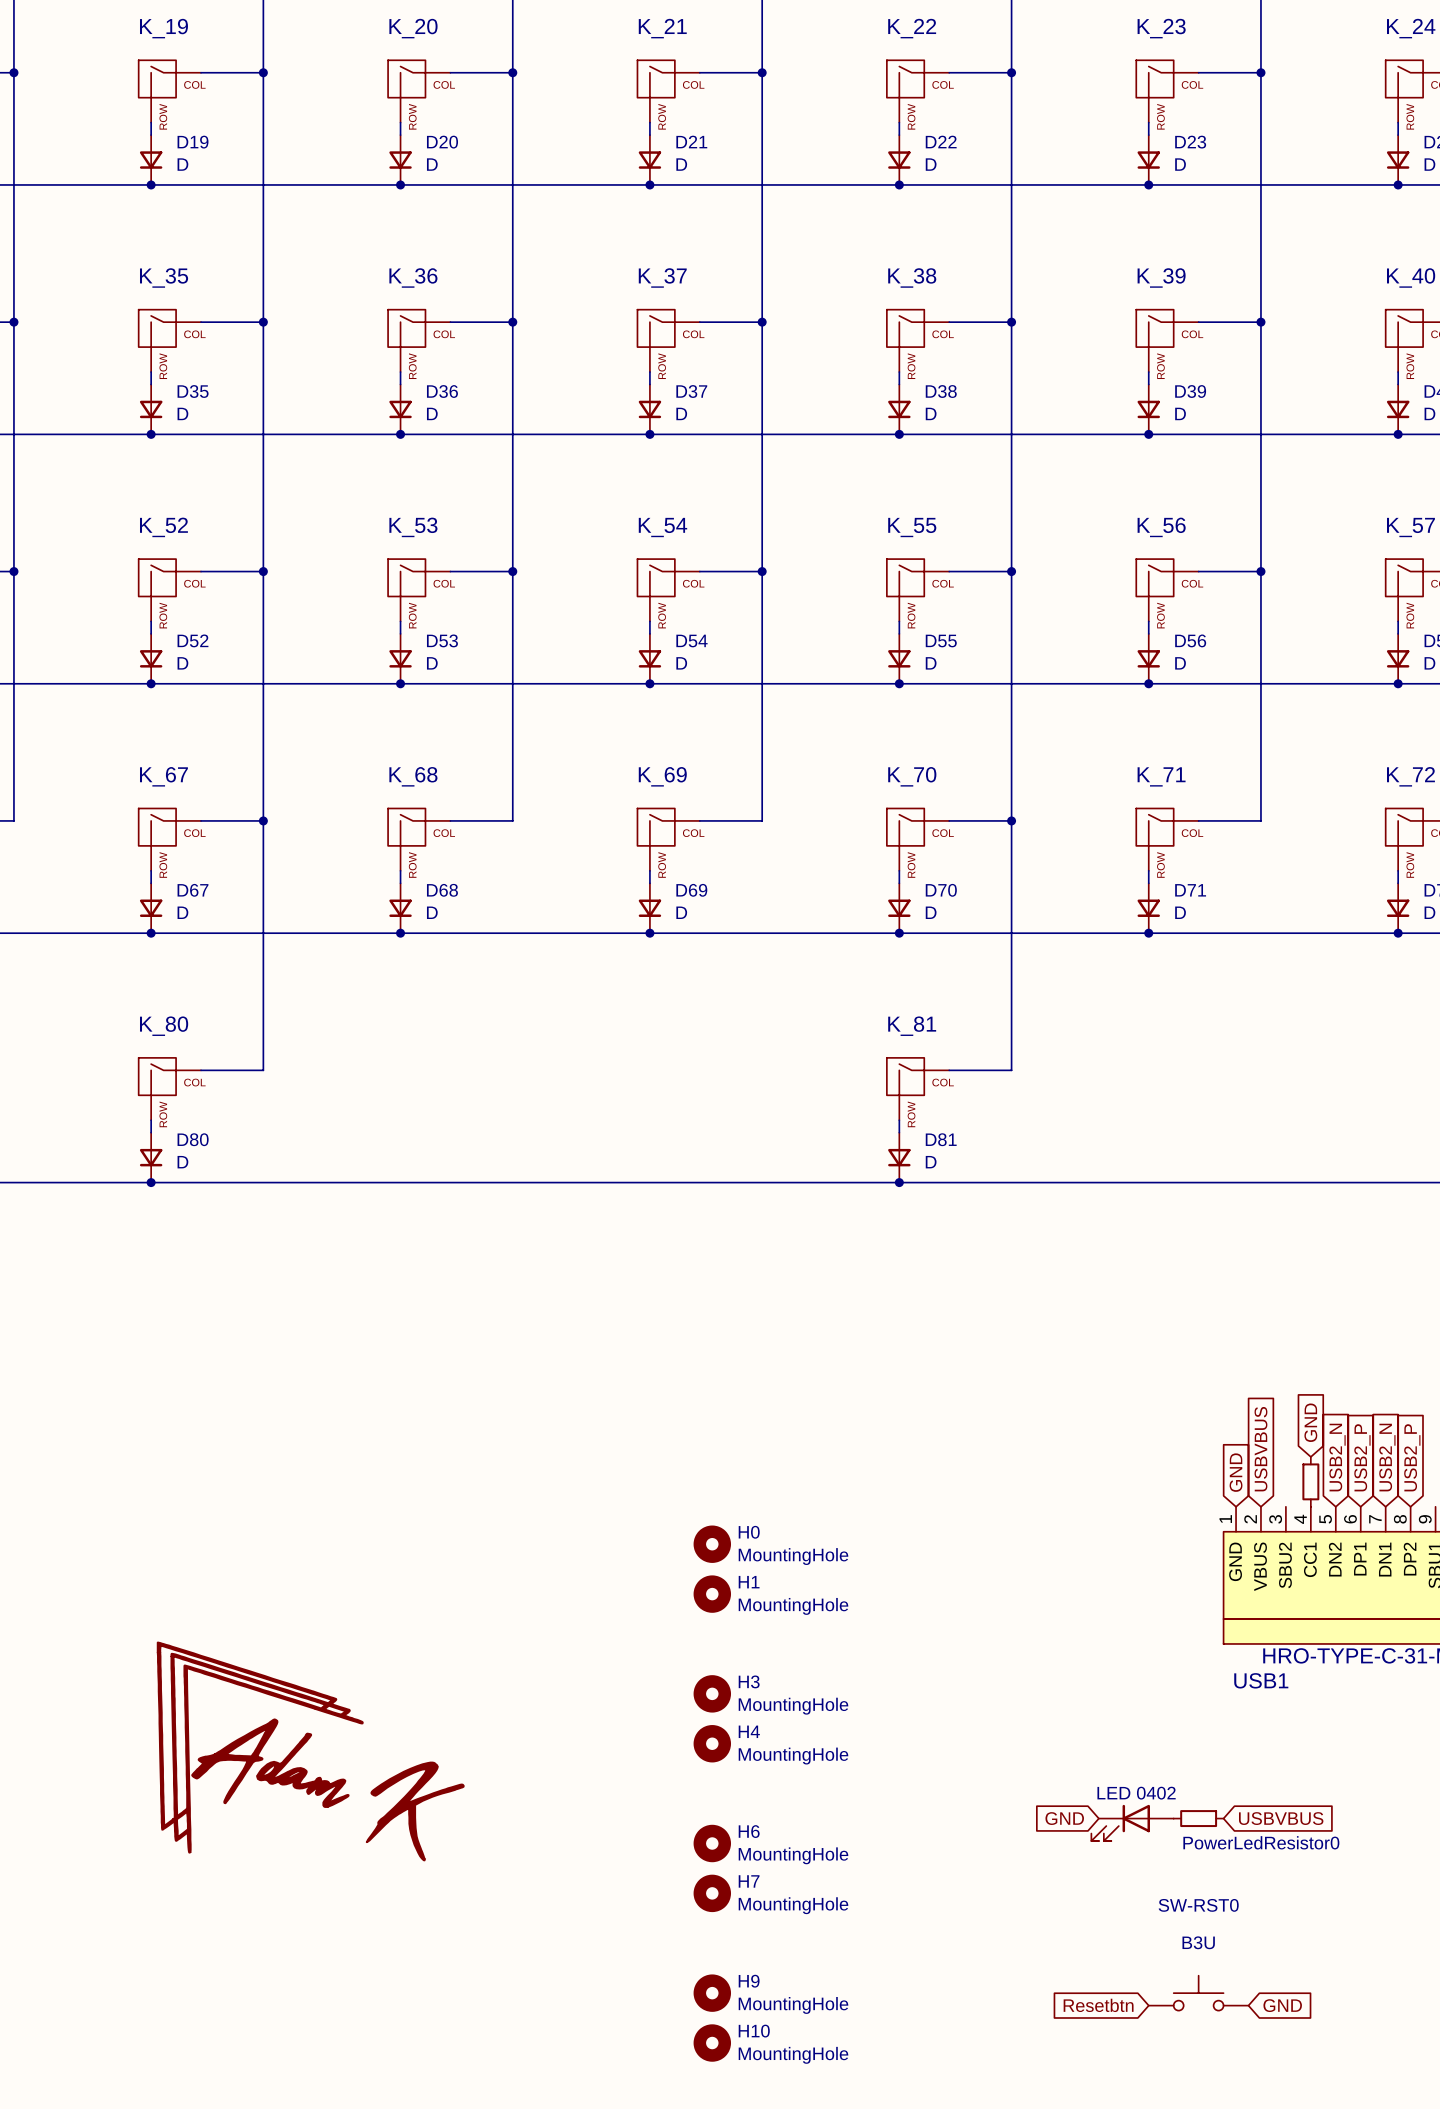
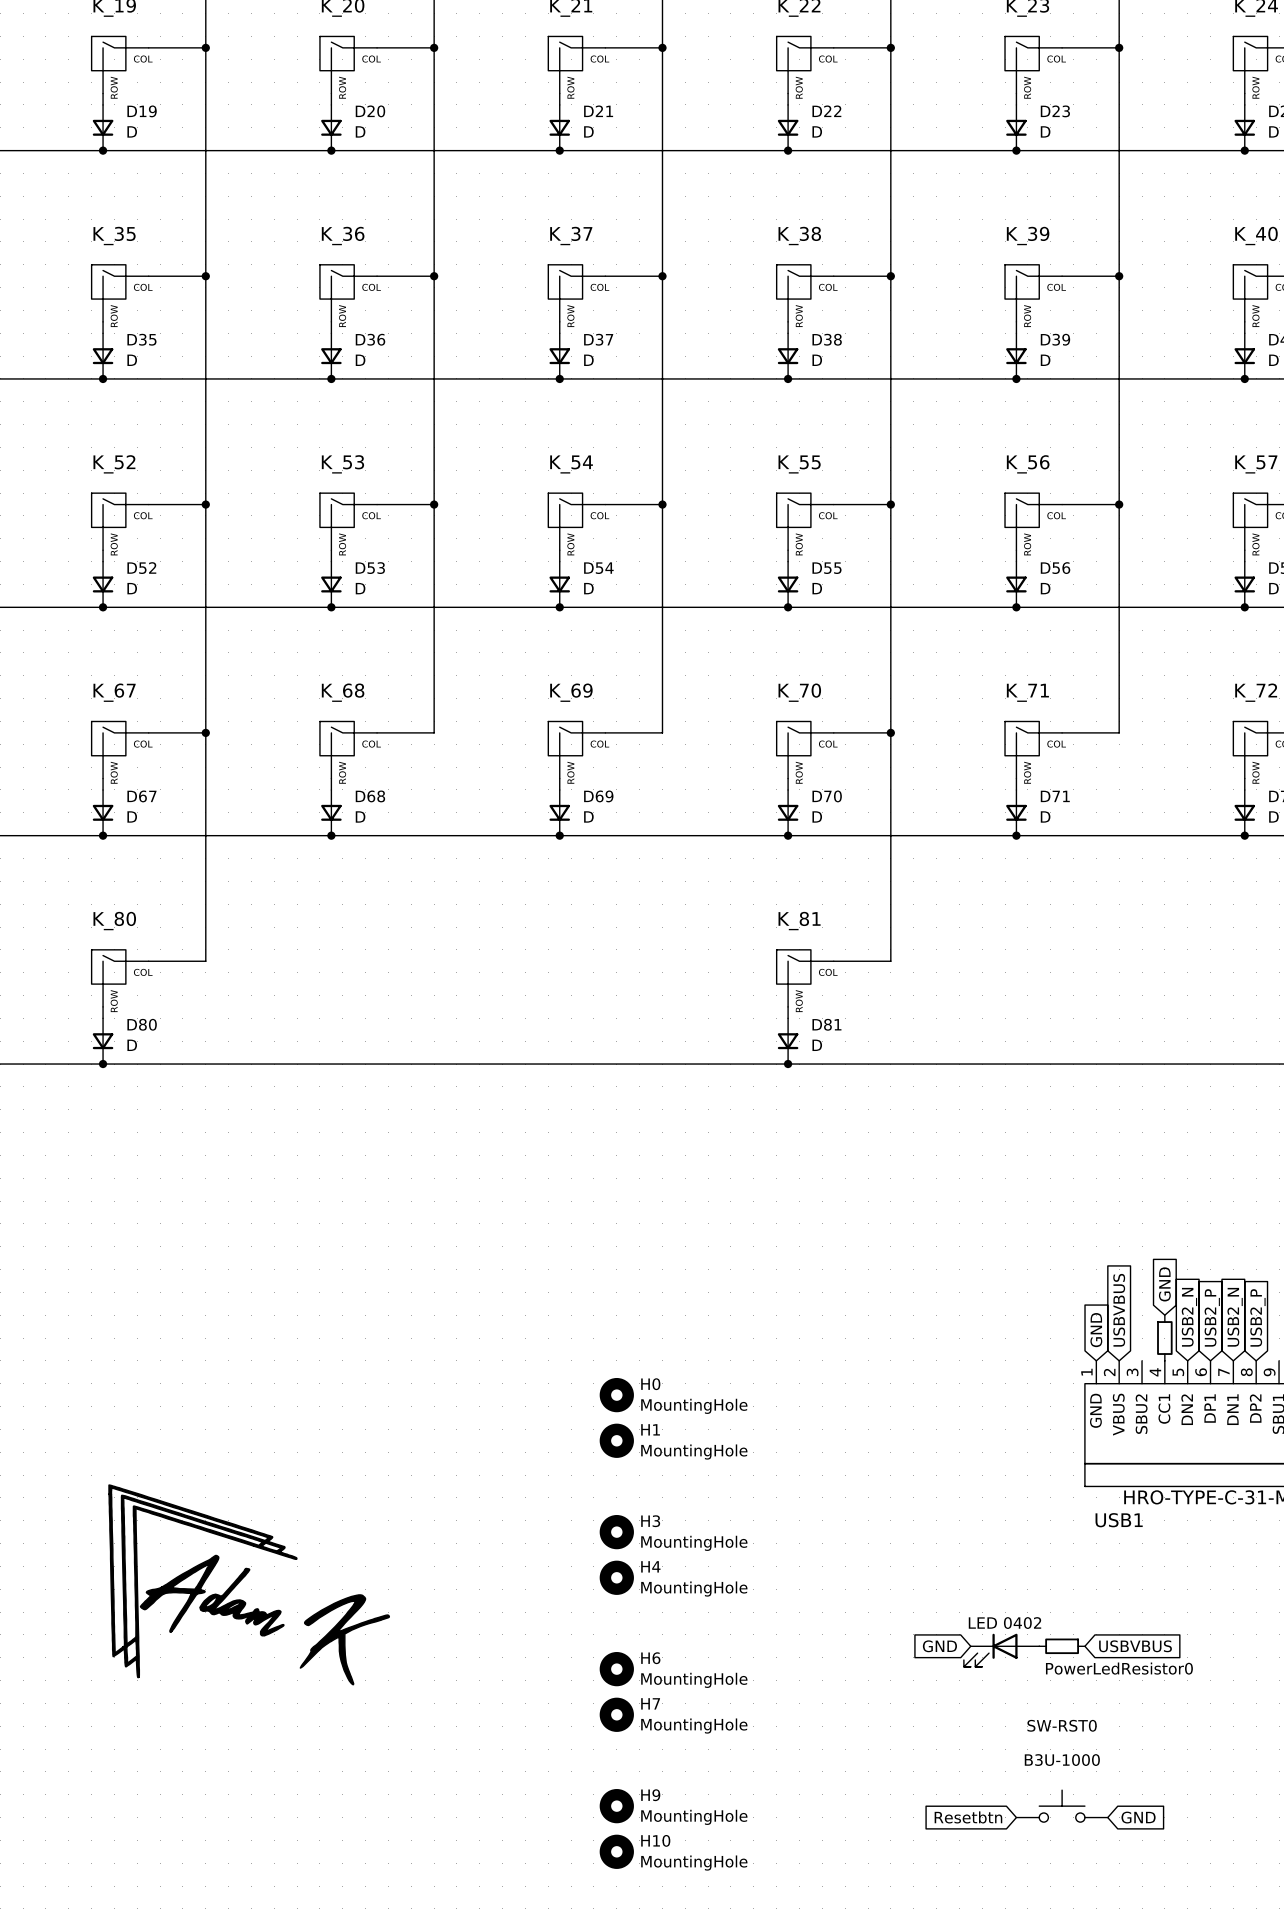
SW-RST0 value: B3U (1198, 1942) -> B3U-1000 (1062, 1760)

